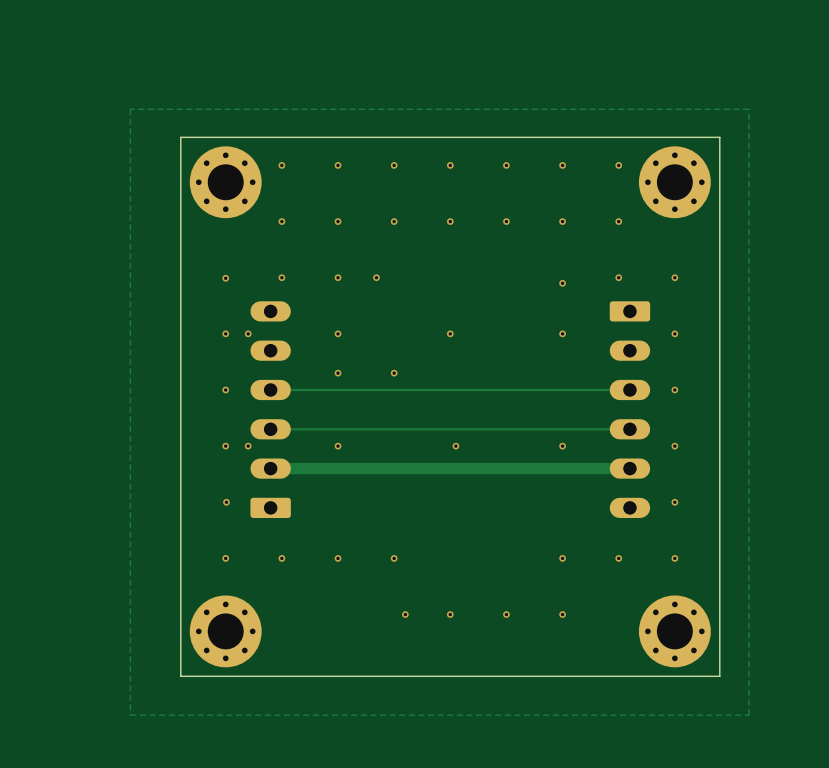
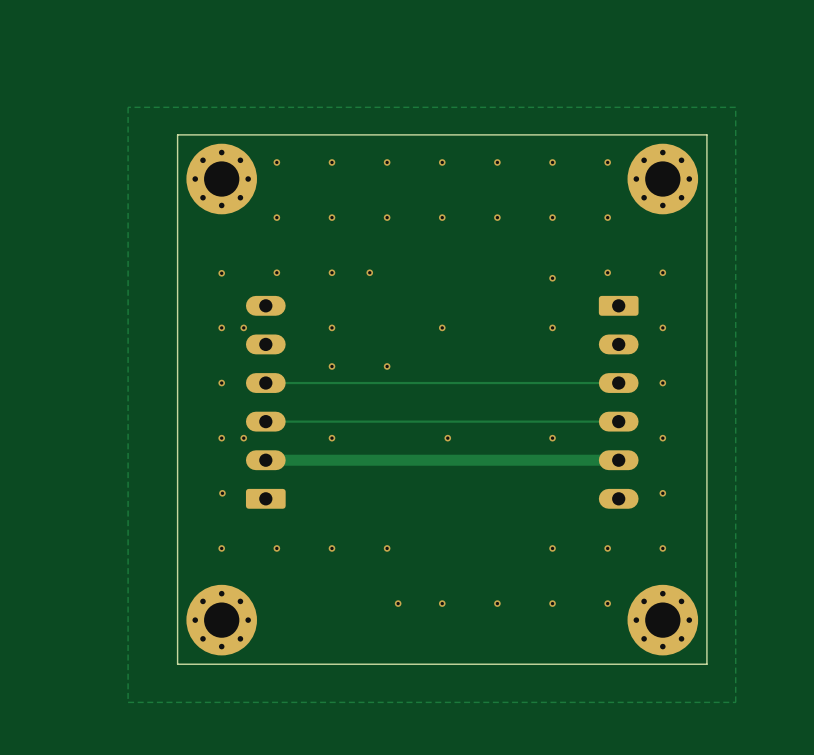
via: none -> (607, 603)

